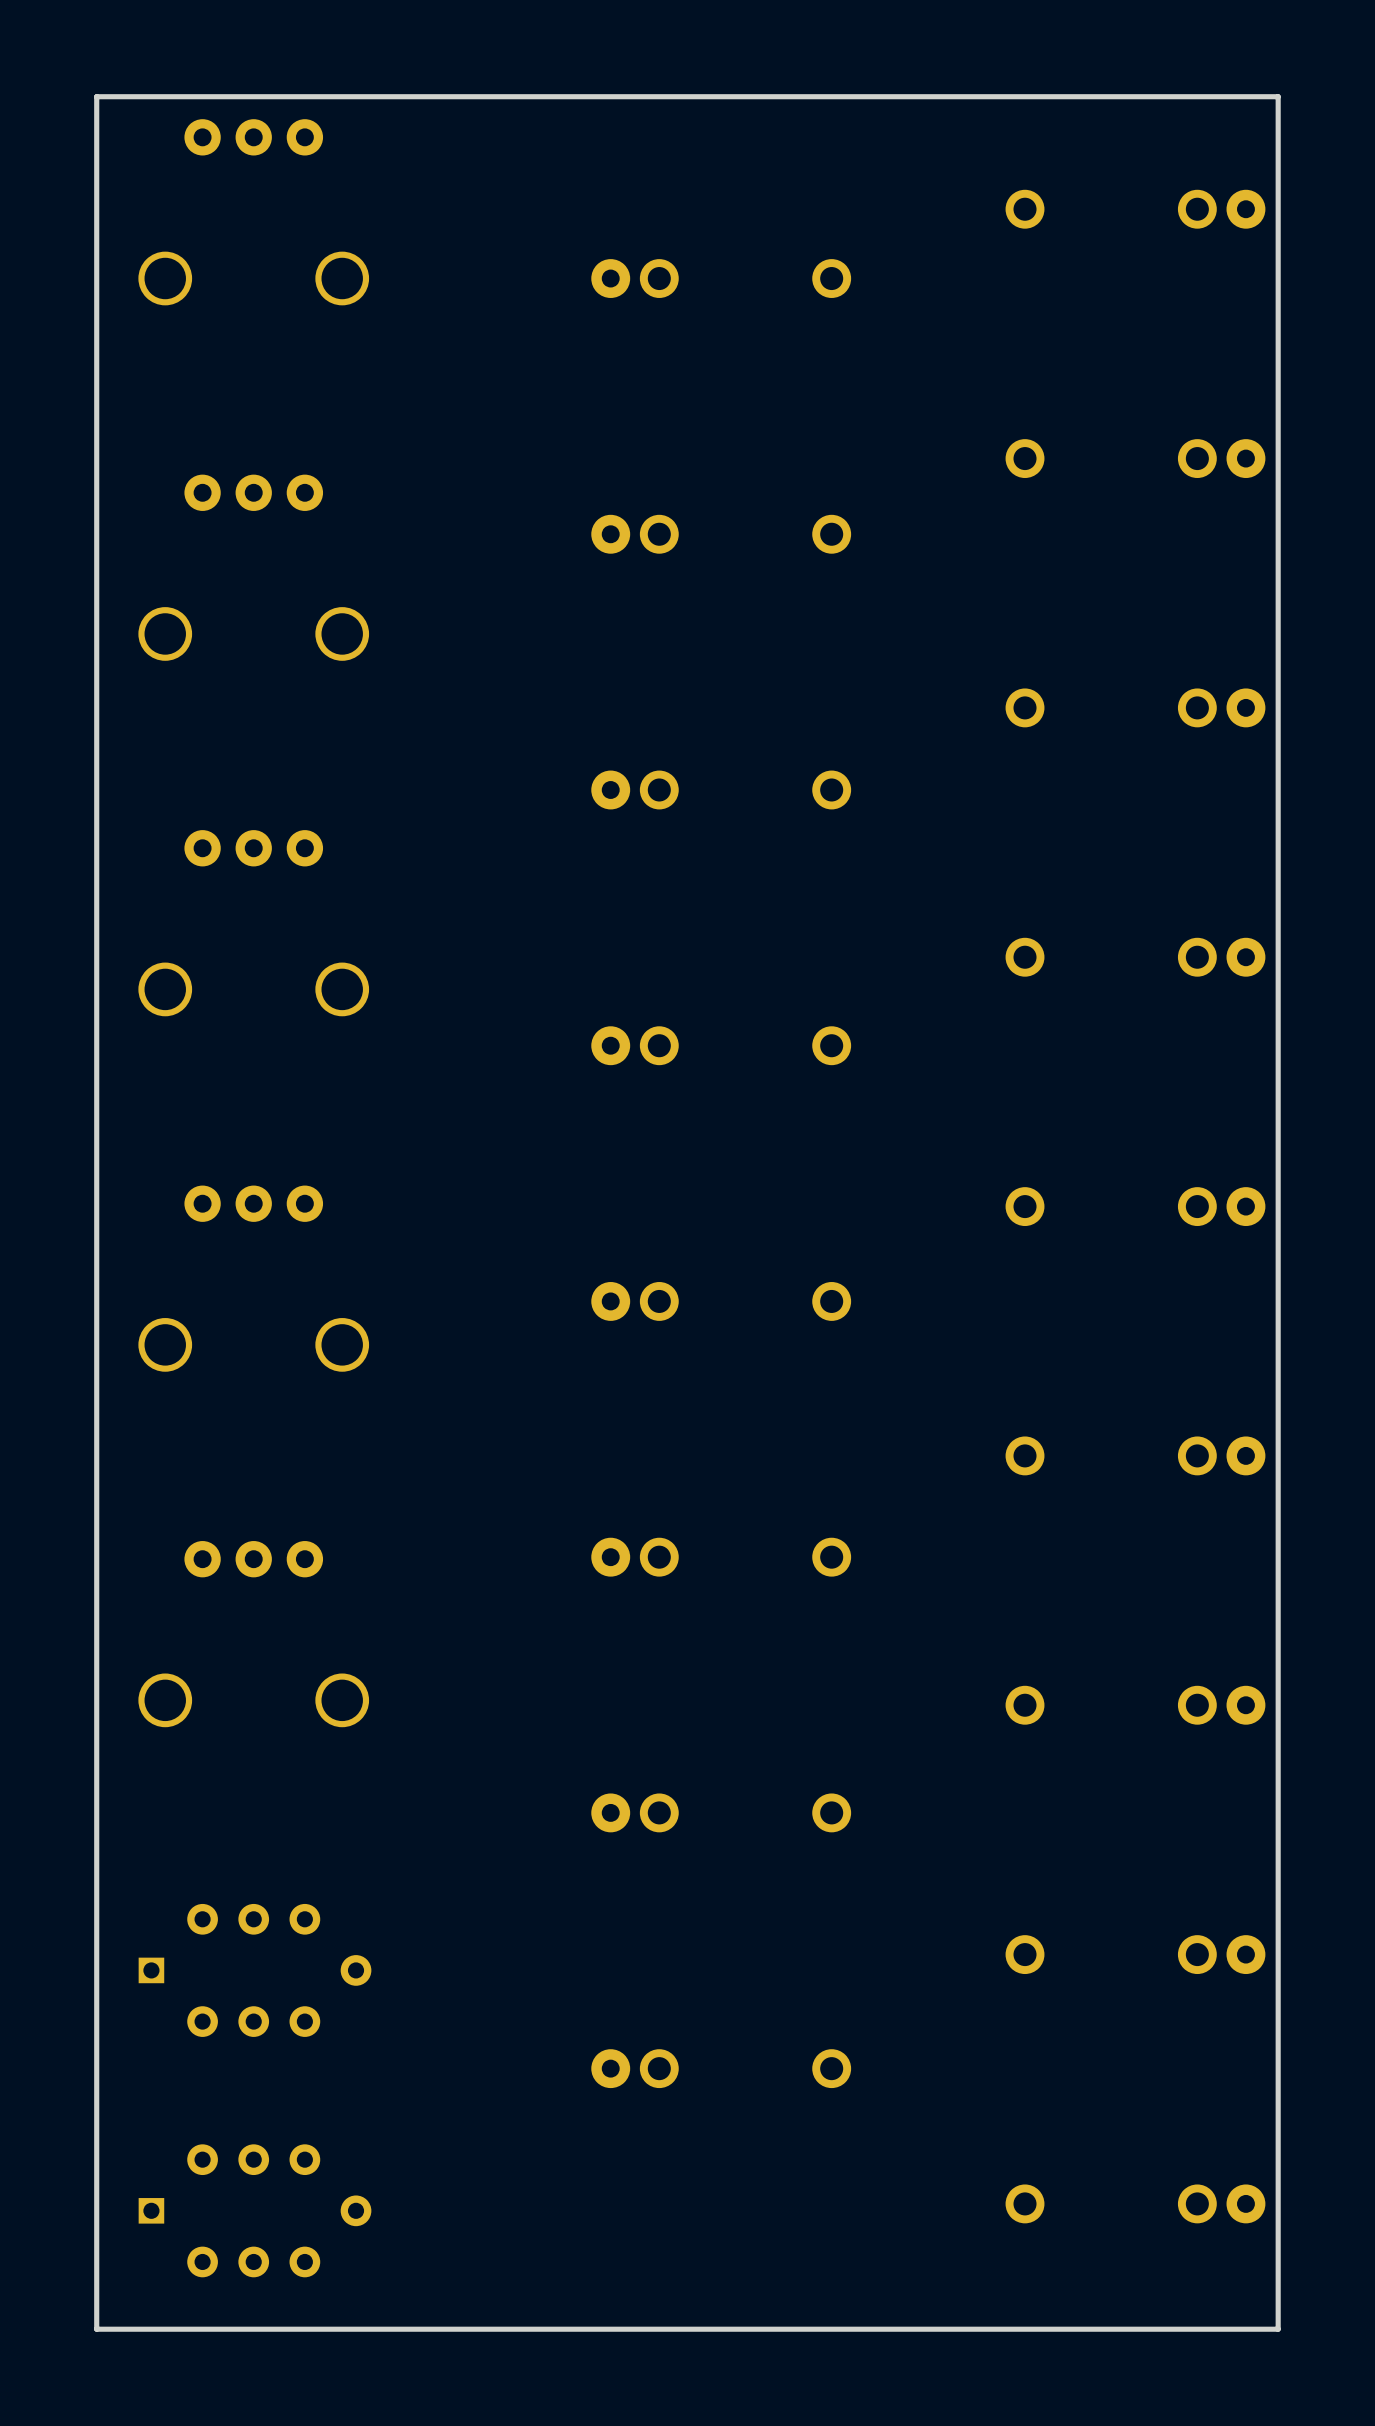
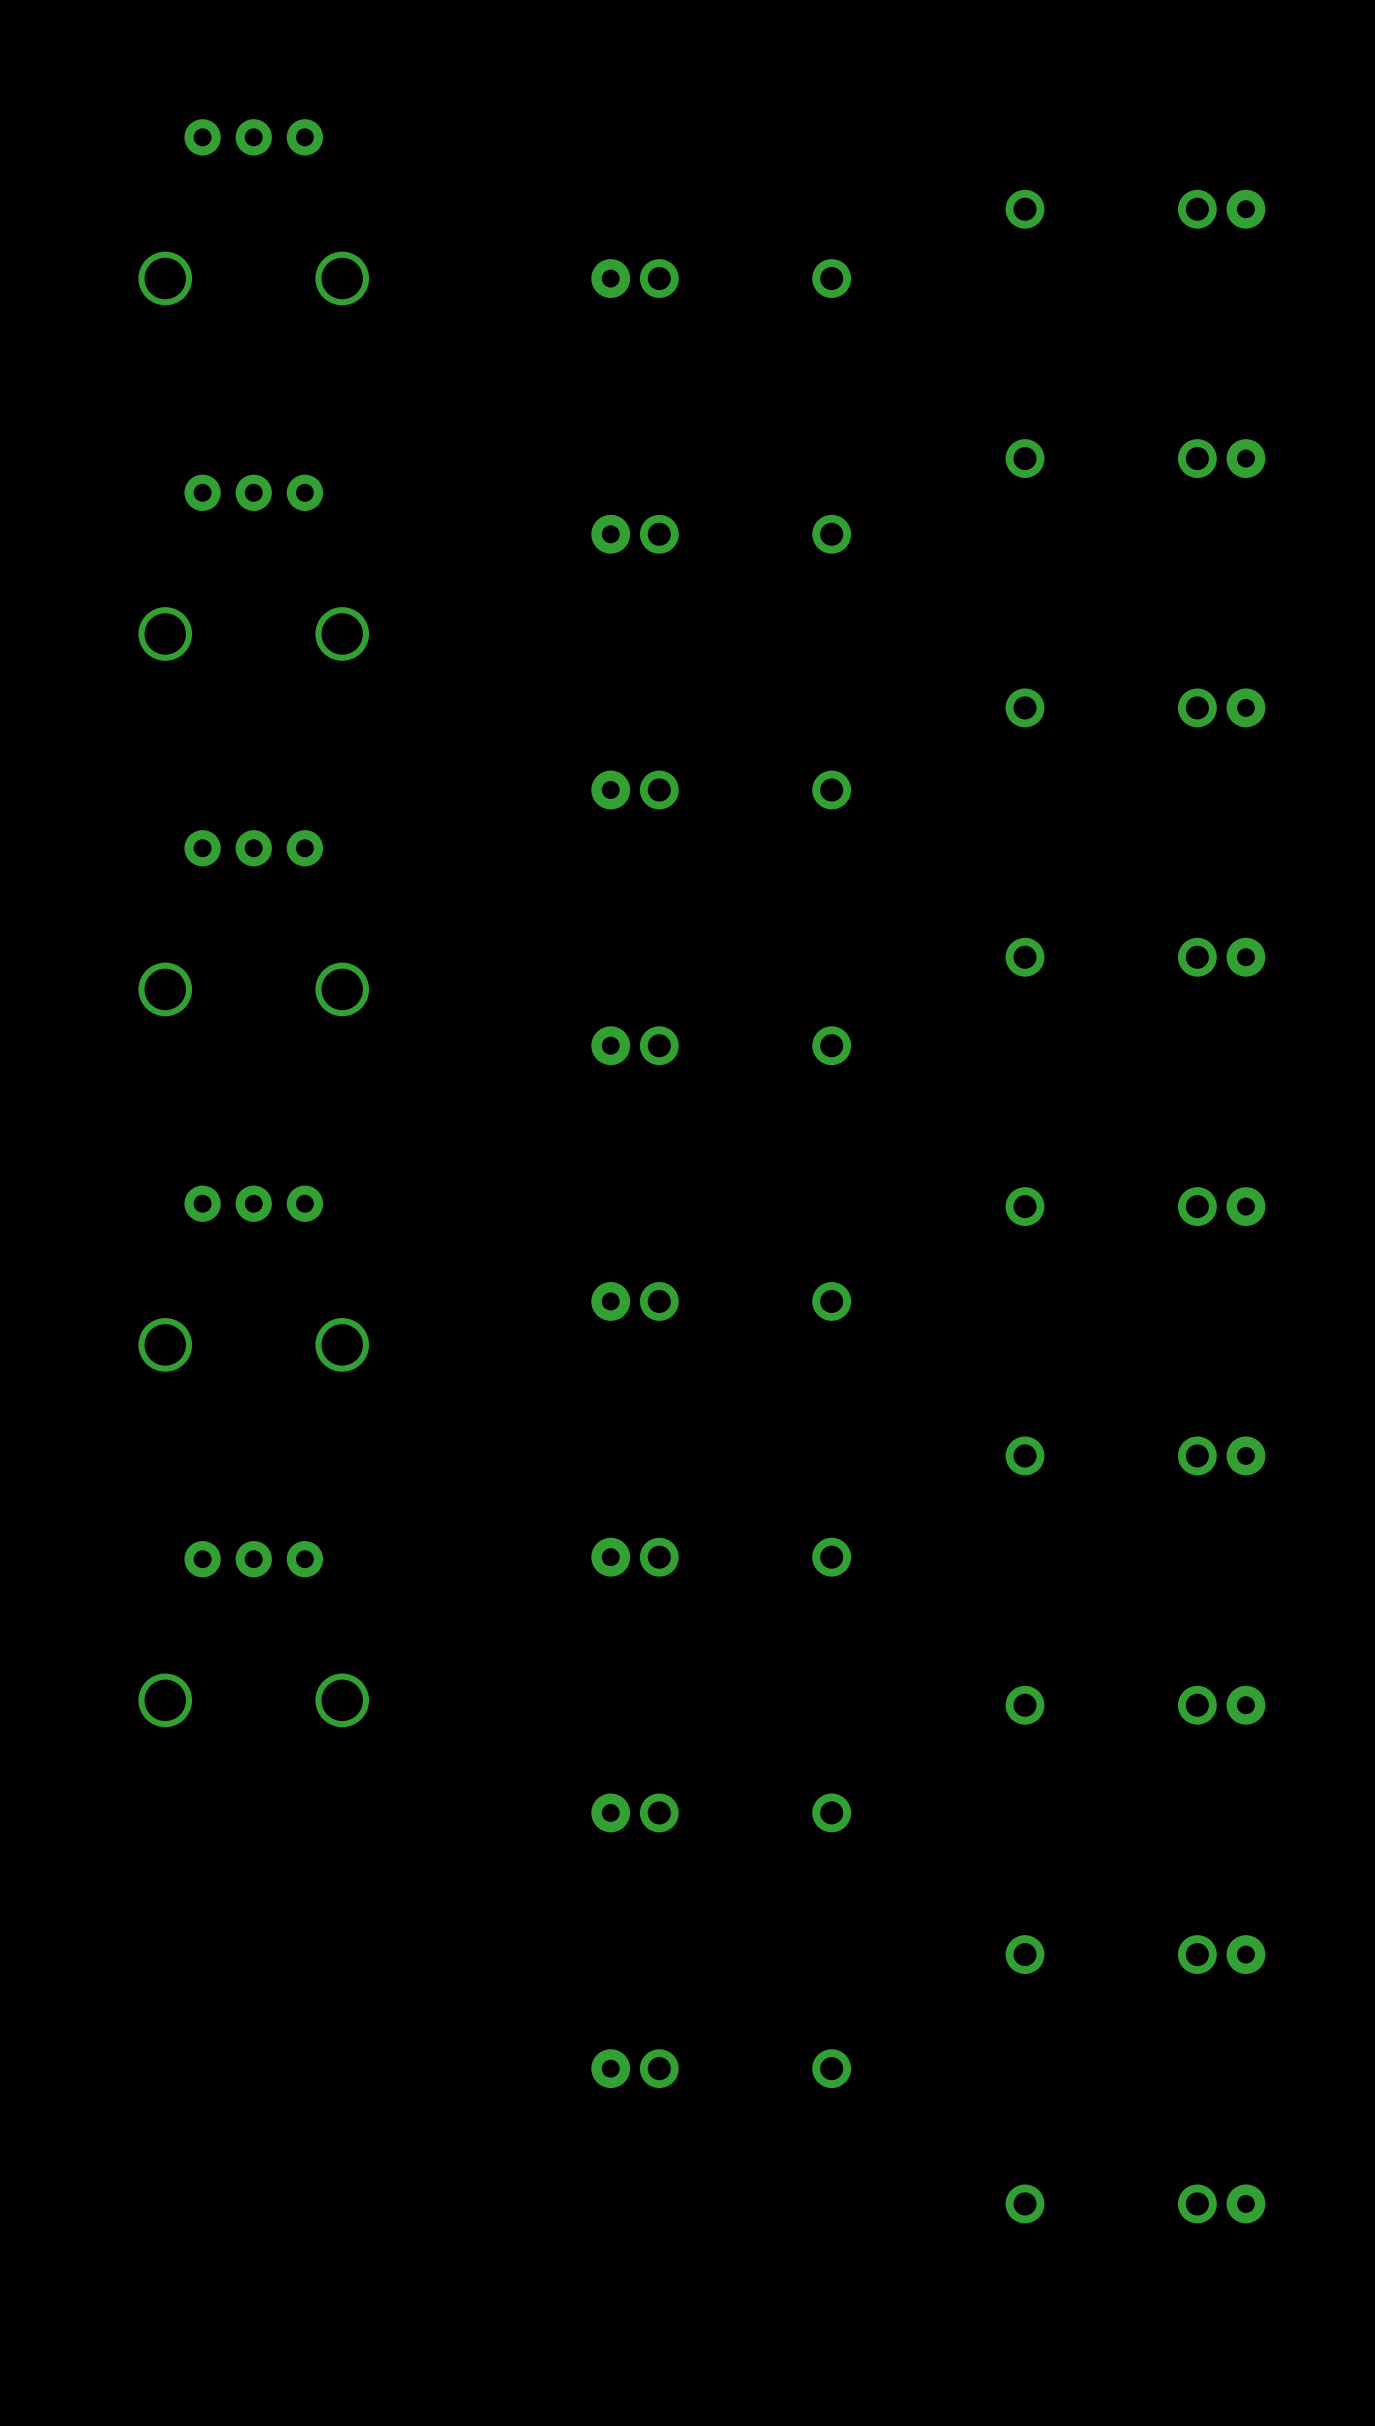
board edge: (96, 96) (1278, 96) (1278, 2329) (96, 2329) (96, 96) -> none
part: (255, 1970) -> none
part: (255, 2210) -> none

